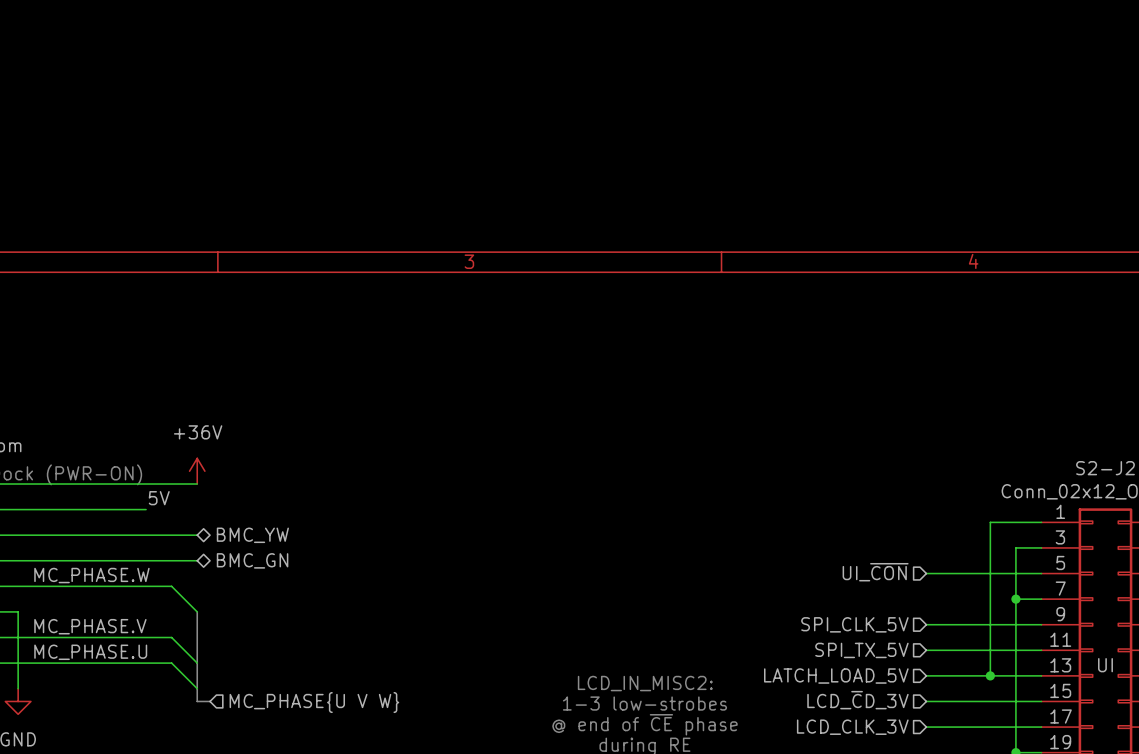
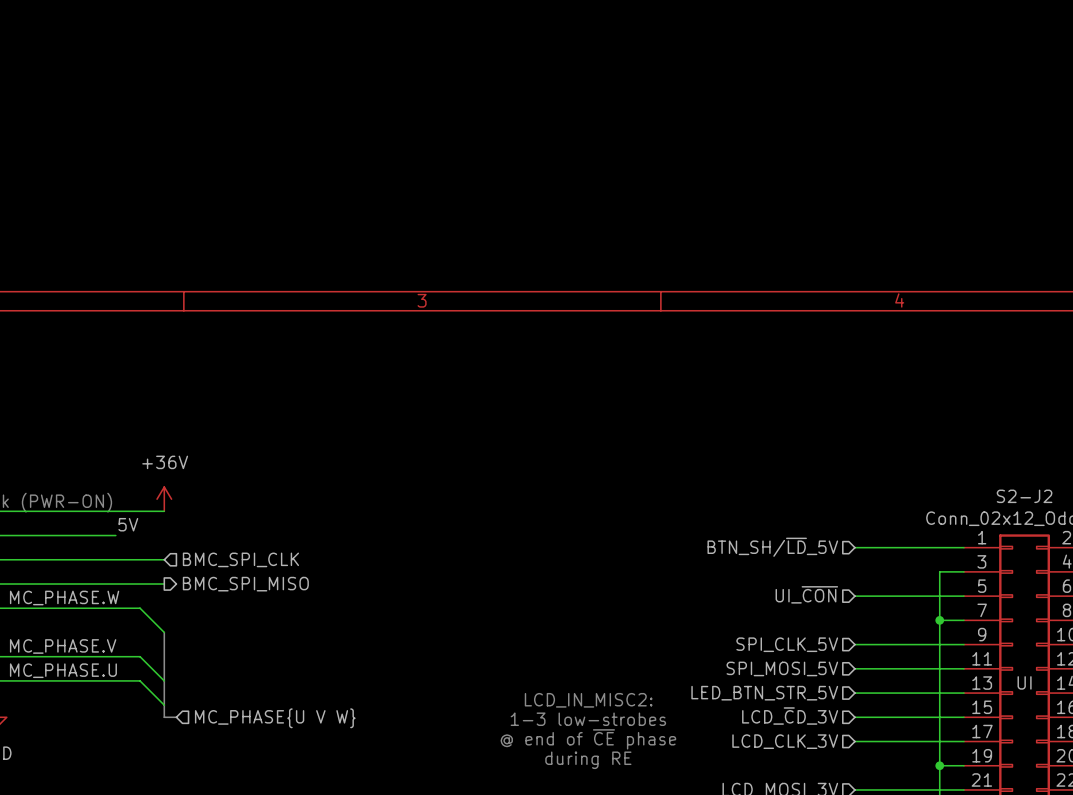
hierarchical label: none -> BTN_SH/~{LD}_5V (772, 547)
wire: (990, 522) (990, 675) -> (915, 547) (854, 547)
hierarchical label shape: bidirectional (252, 535) -> input (240, 559)
hierarchical label: BMC_YW (252, 535) -> BMC_SPI_CLK (240, 559)
hierarchical label shape: bidirectional (252, 560) -> output (245, 584)
hierarchical label: BMC_GN (252, 560) -> BMC_SPI_MISO (245, 584)
hierarchical label: SPI_TX_5V (861, 650) -> SPI_MOSI_5V (782, 668)
junction: (990, 675) -> none
hierarchical label: LATCH_LOAD_5V (836, 676) -> LED_BTN_STR_5V (764, 693)

